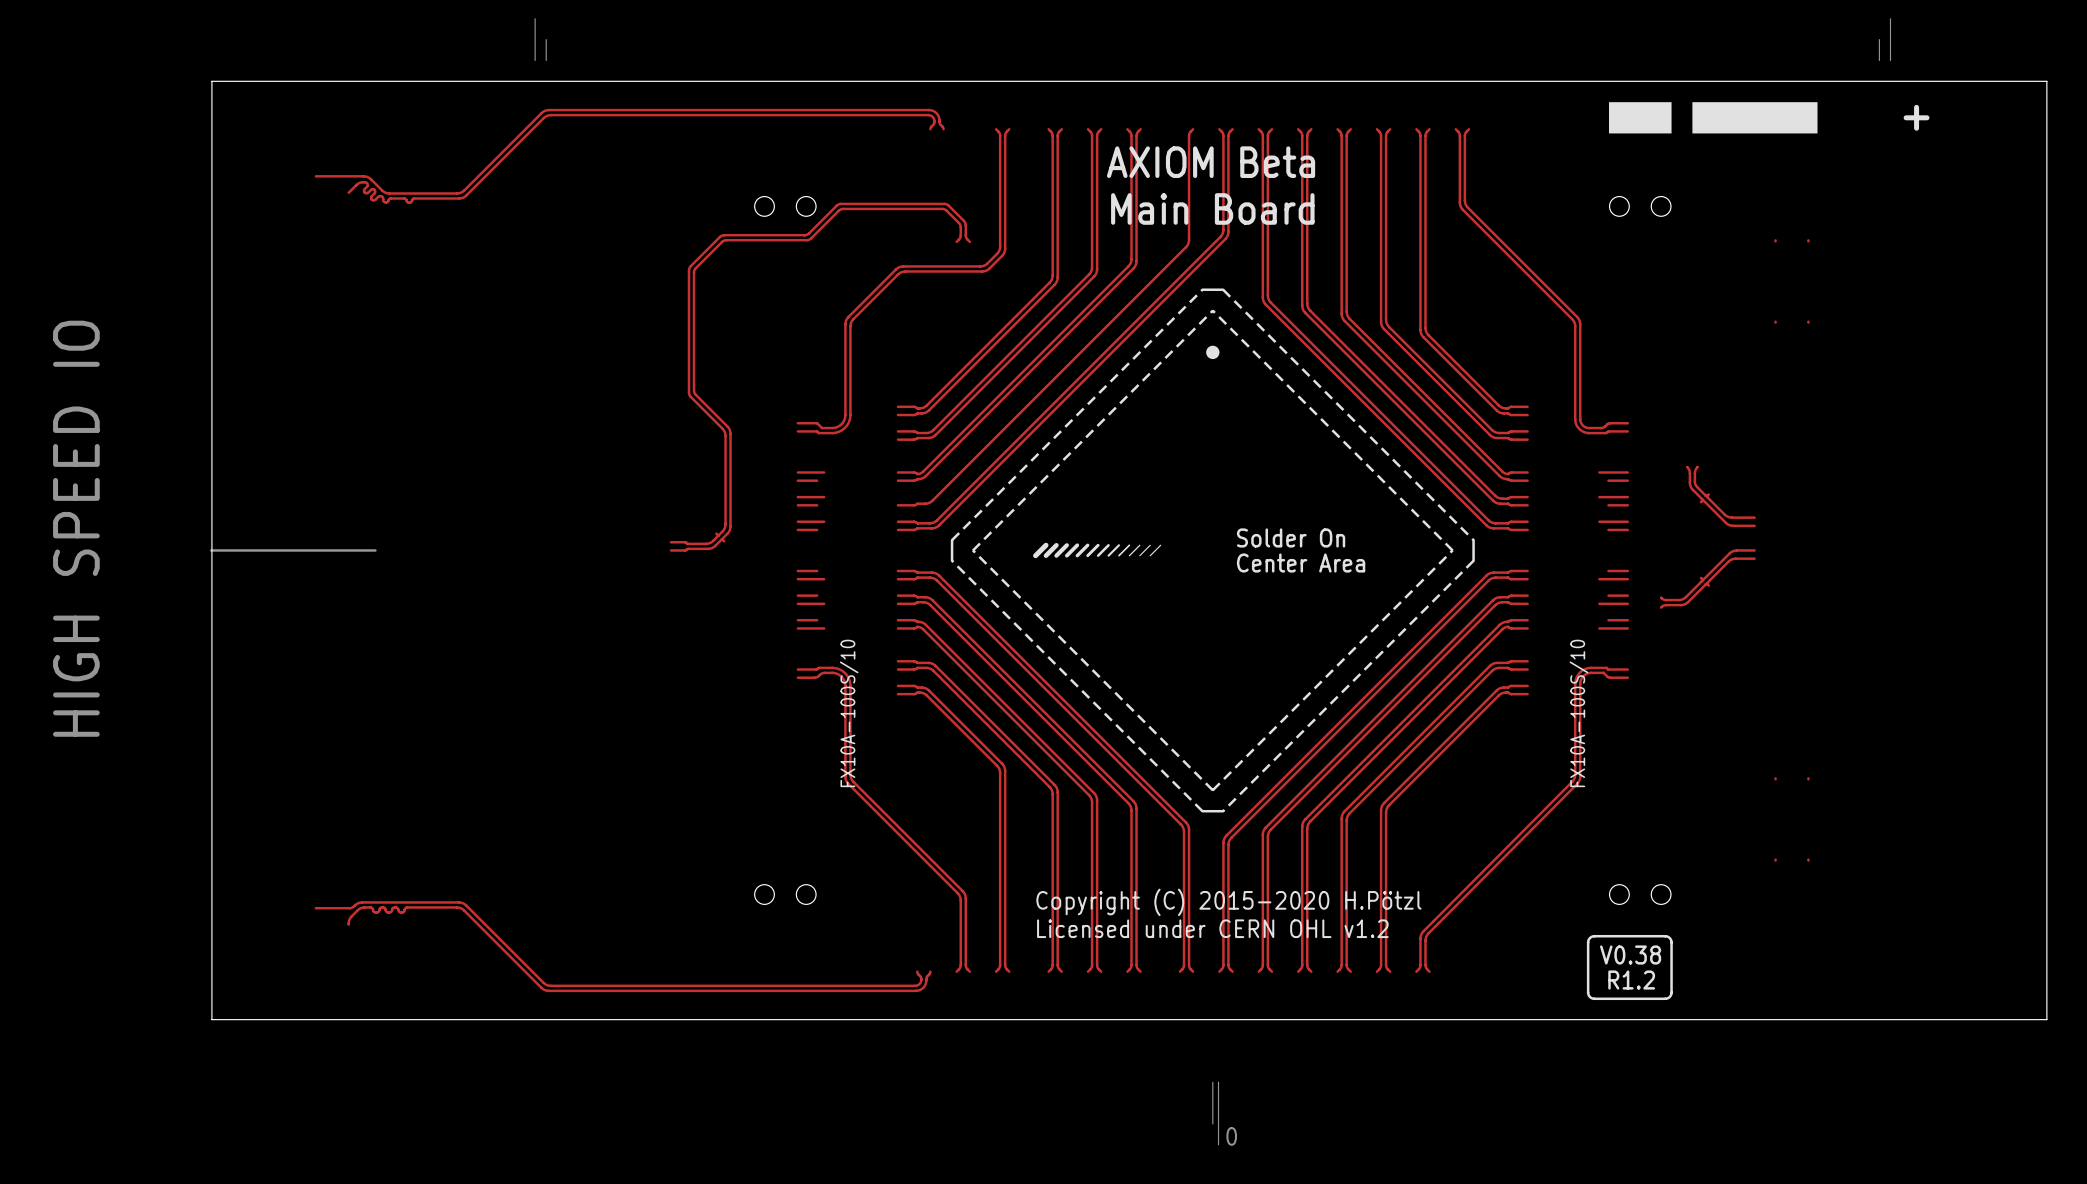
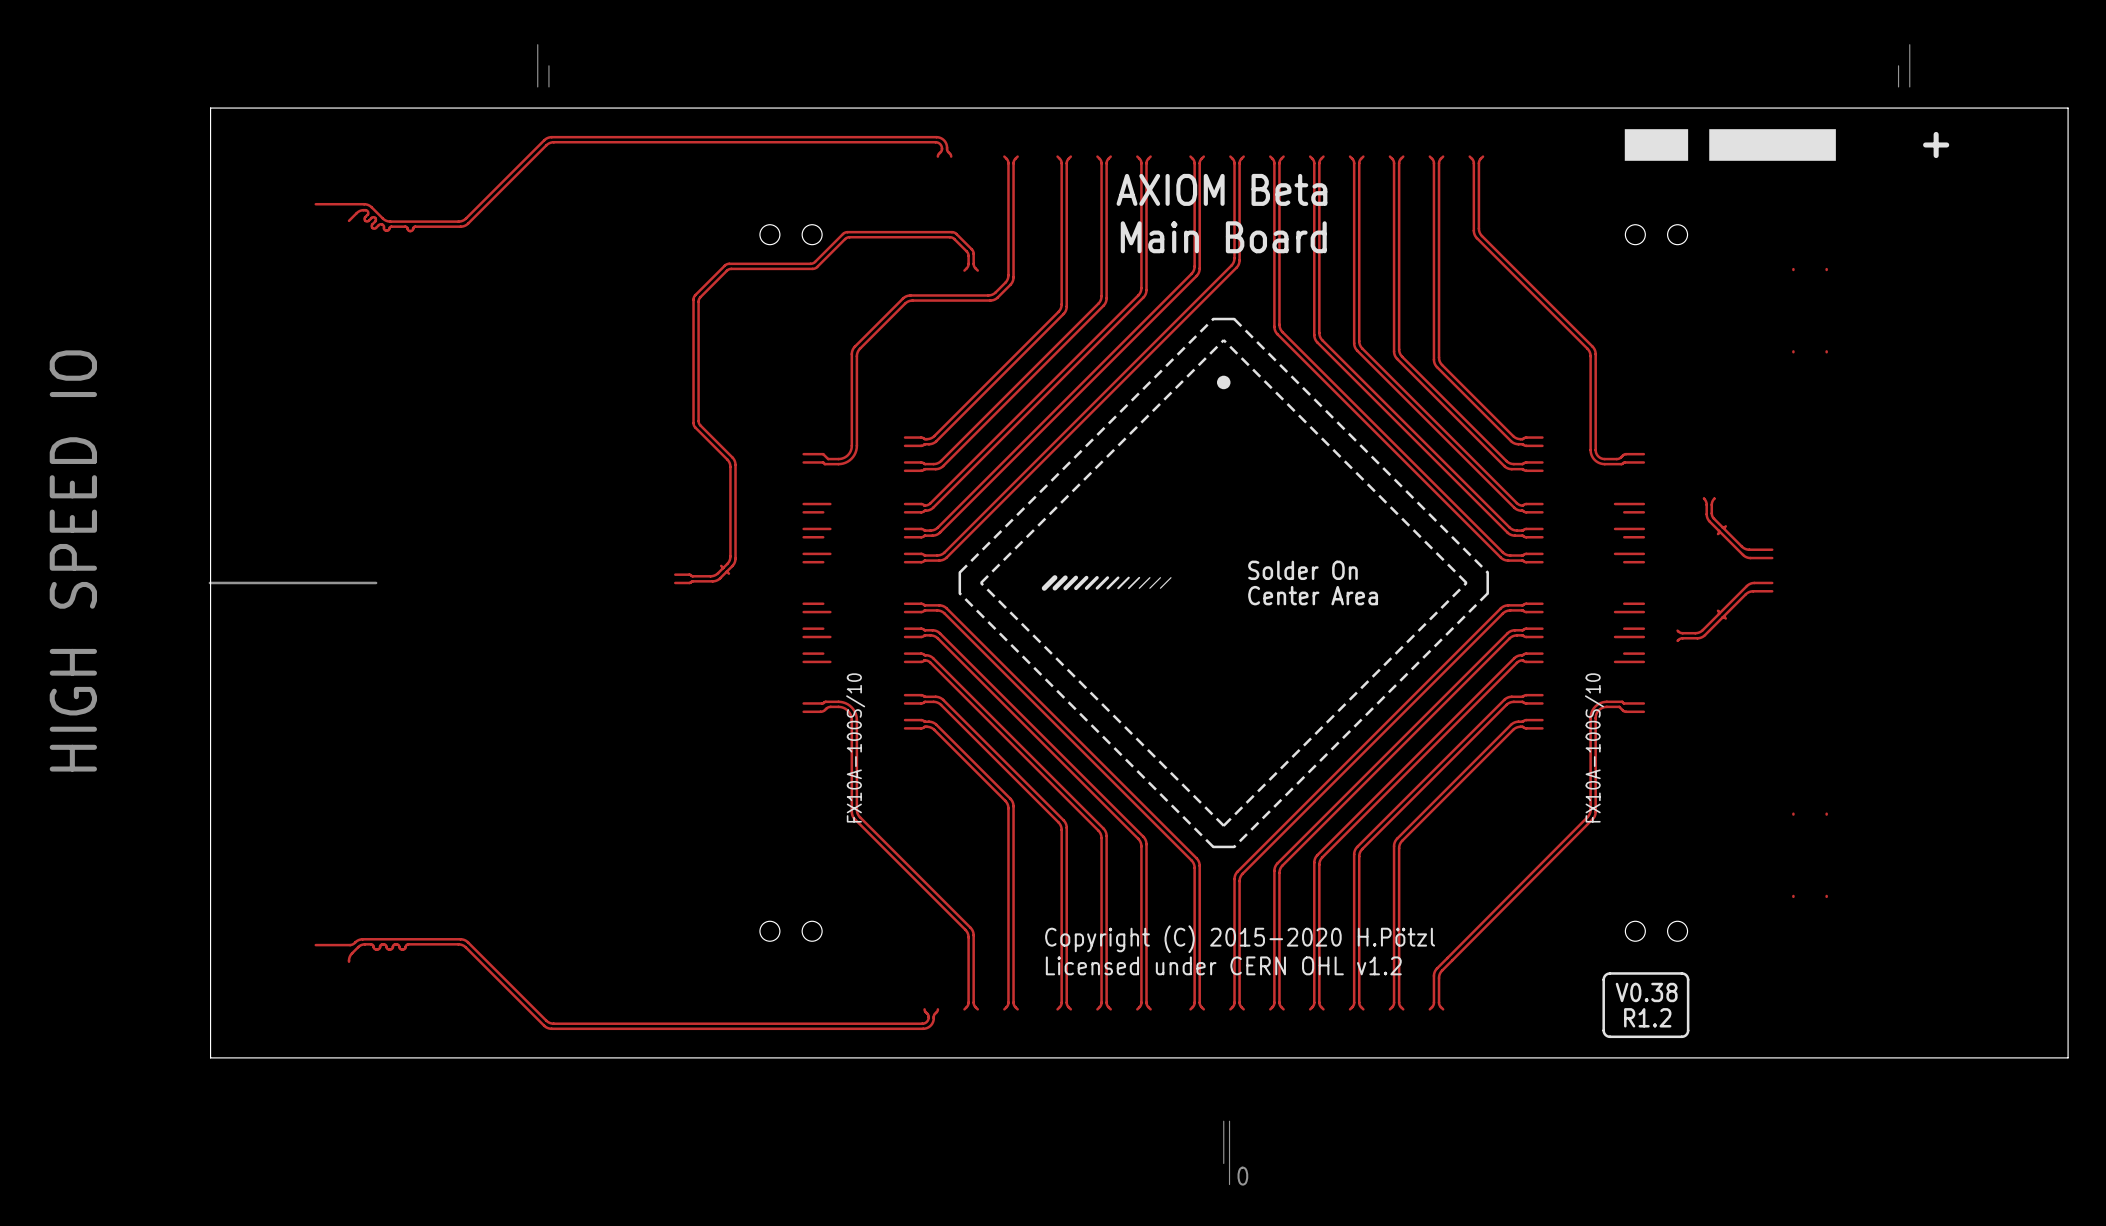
track: none -> (1190, 156) (1194, 163) (1194, 266) (1192, 272) (937, 527) (930, 530) (905, 528)

